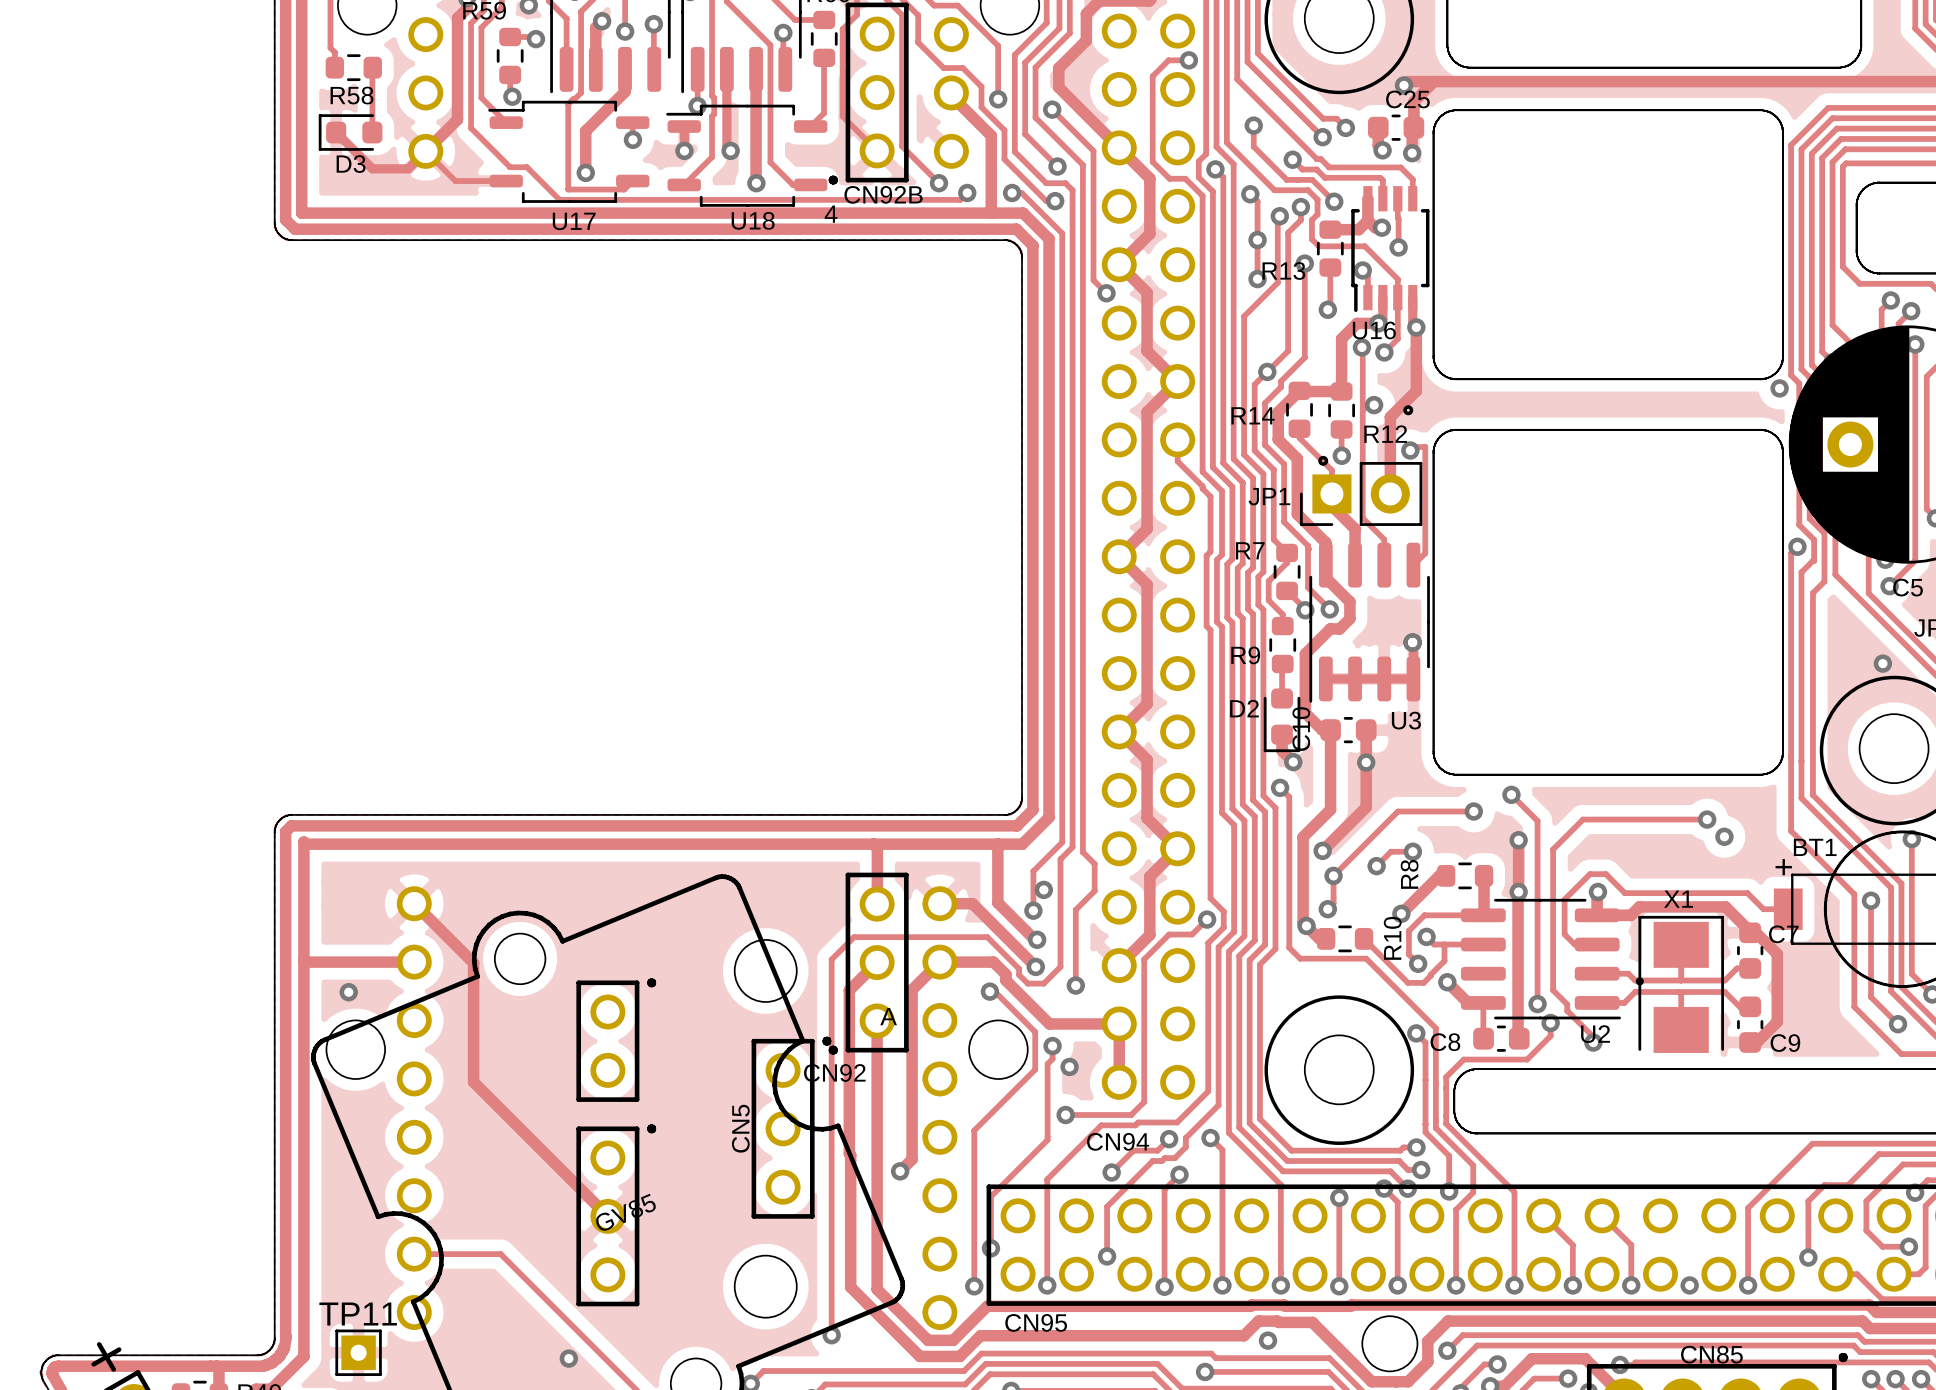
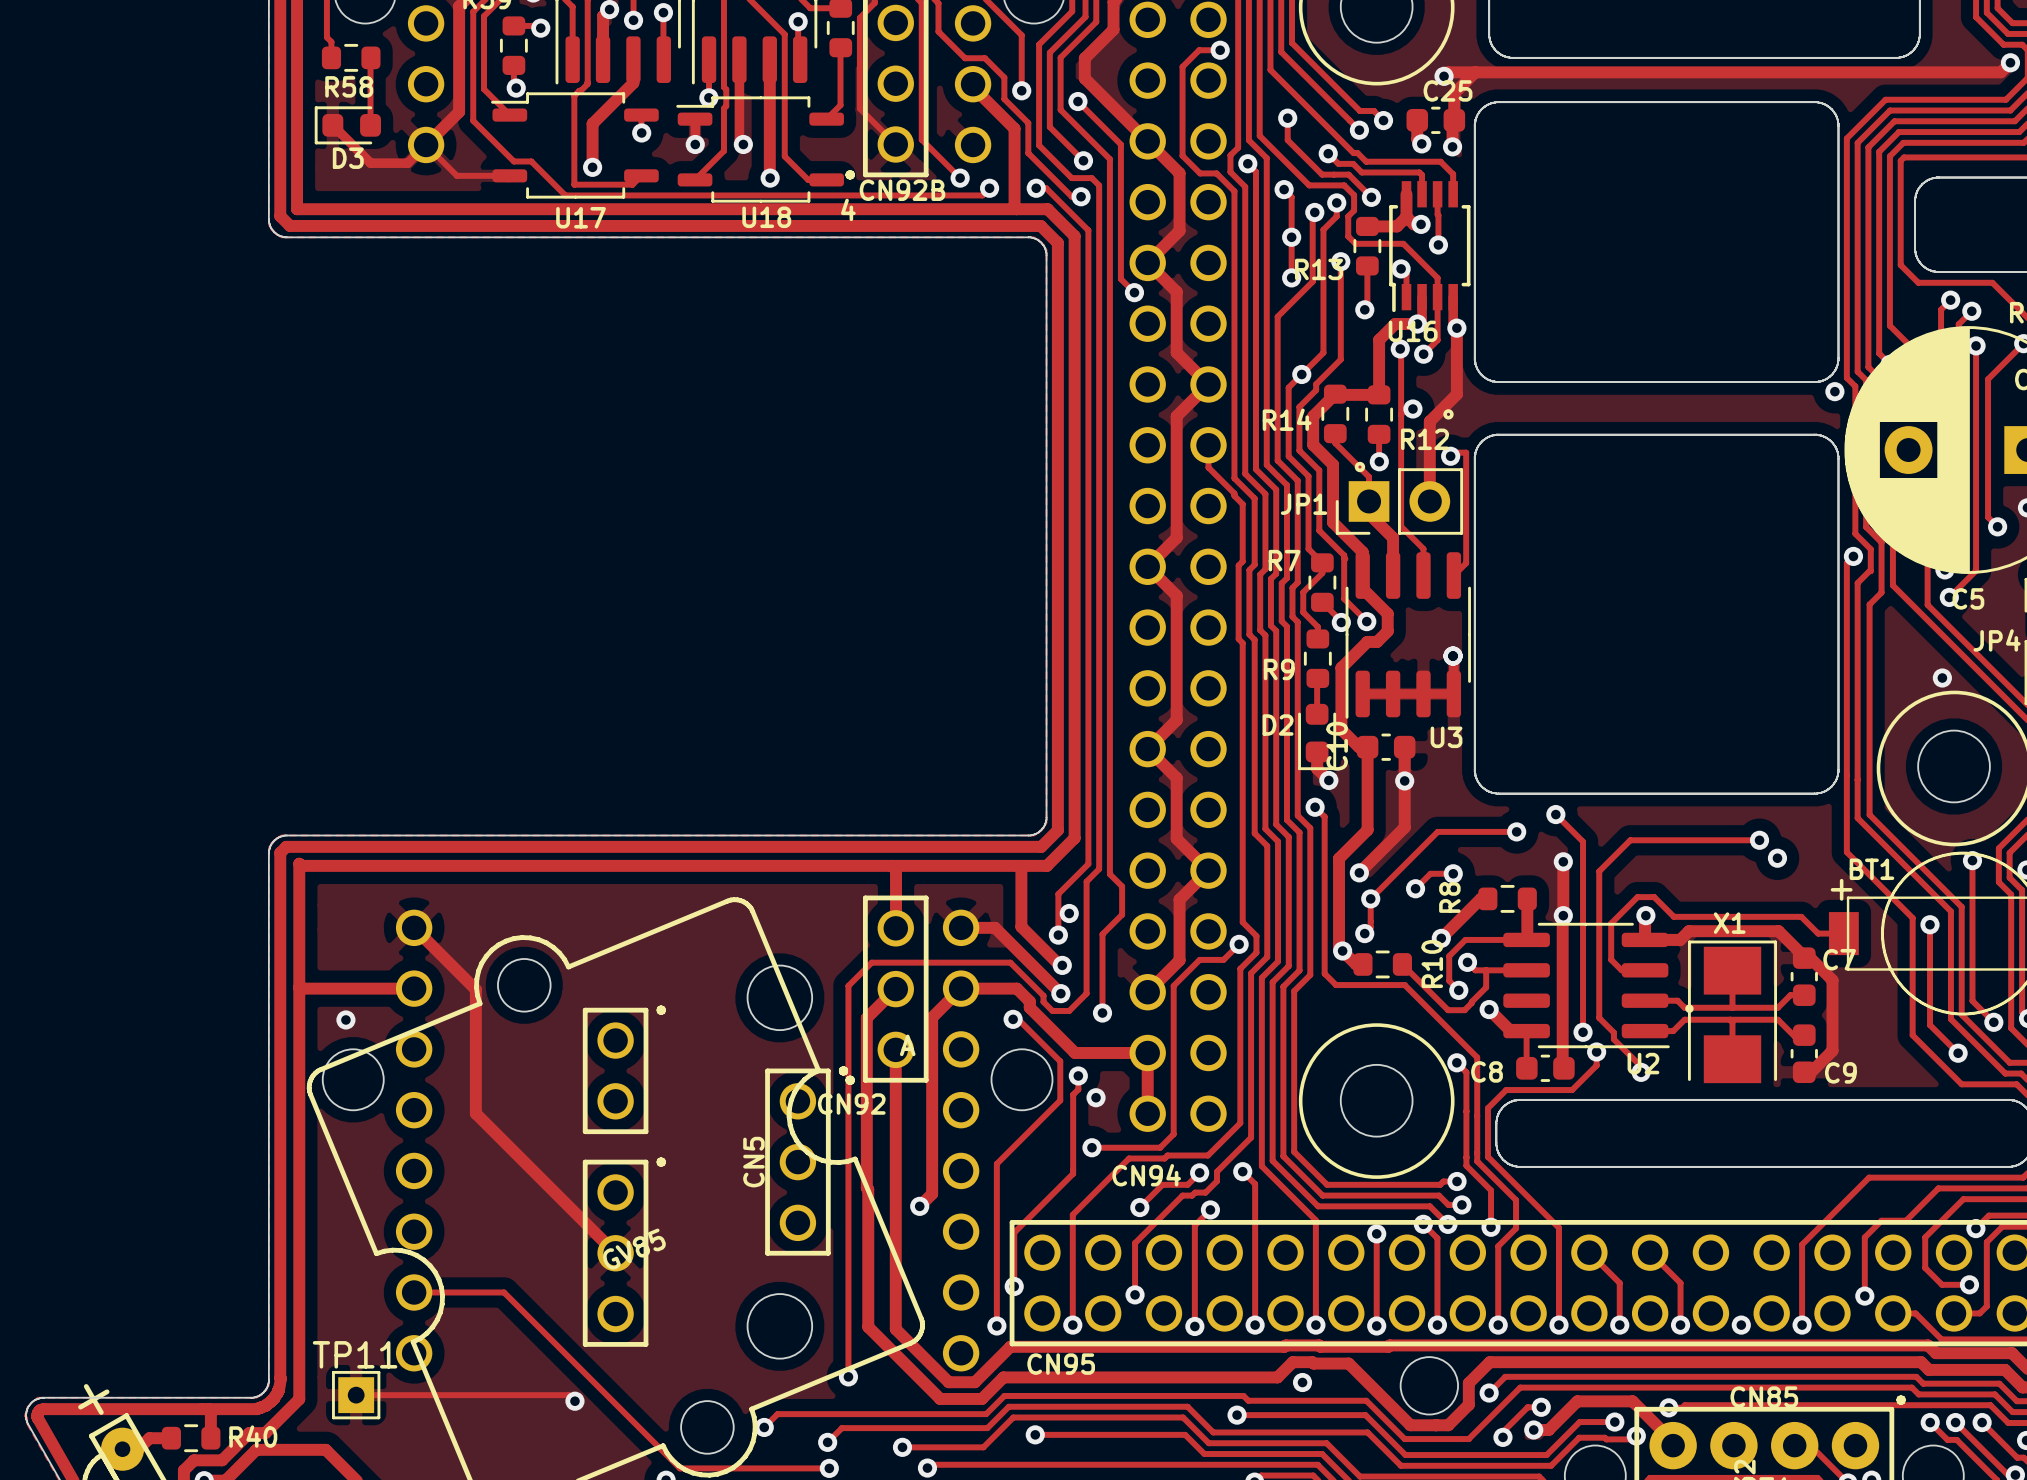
track: none -> (356, 1395) (568, 1395) (574, 1401)

